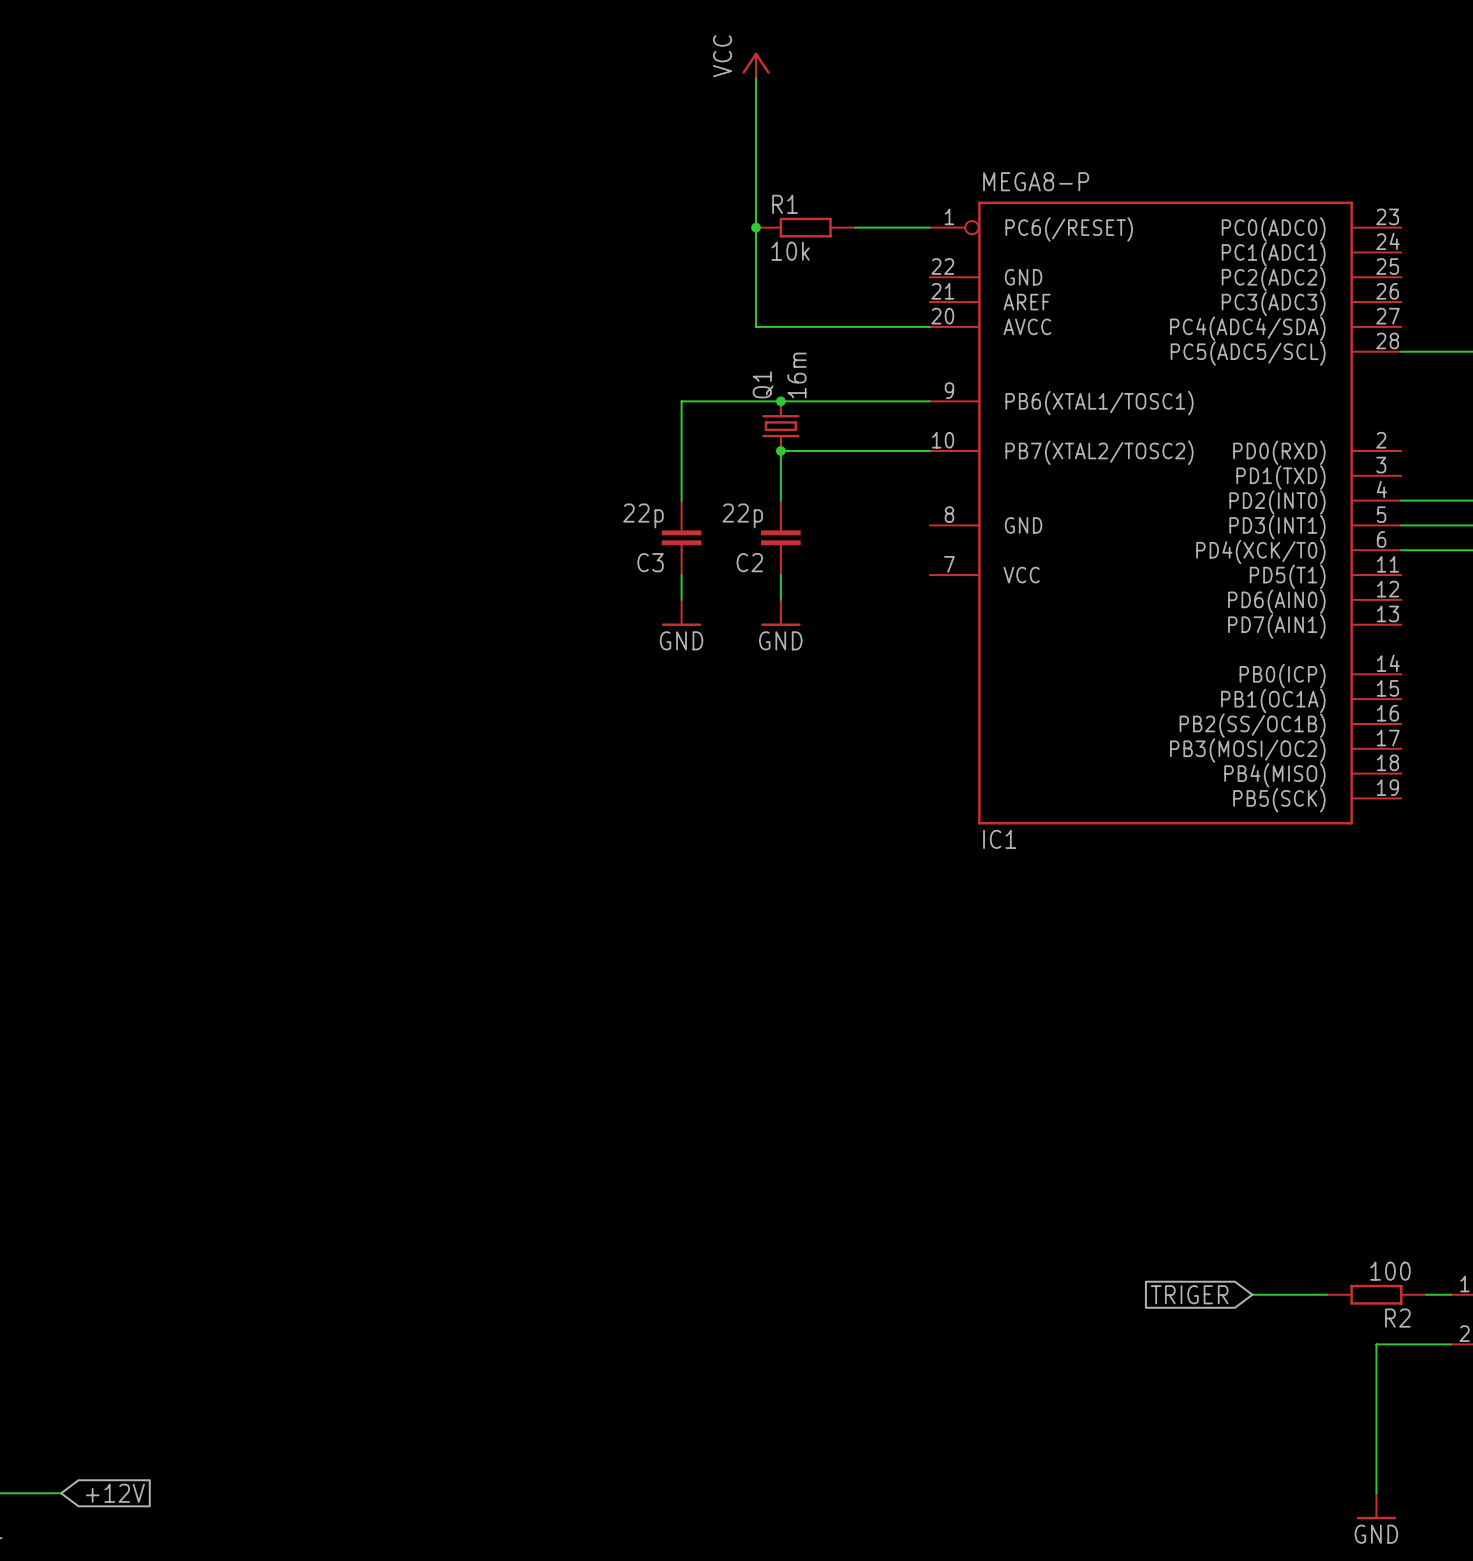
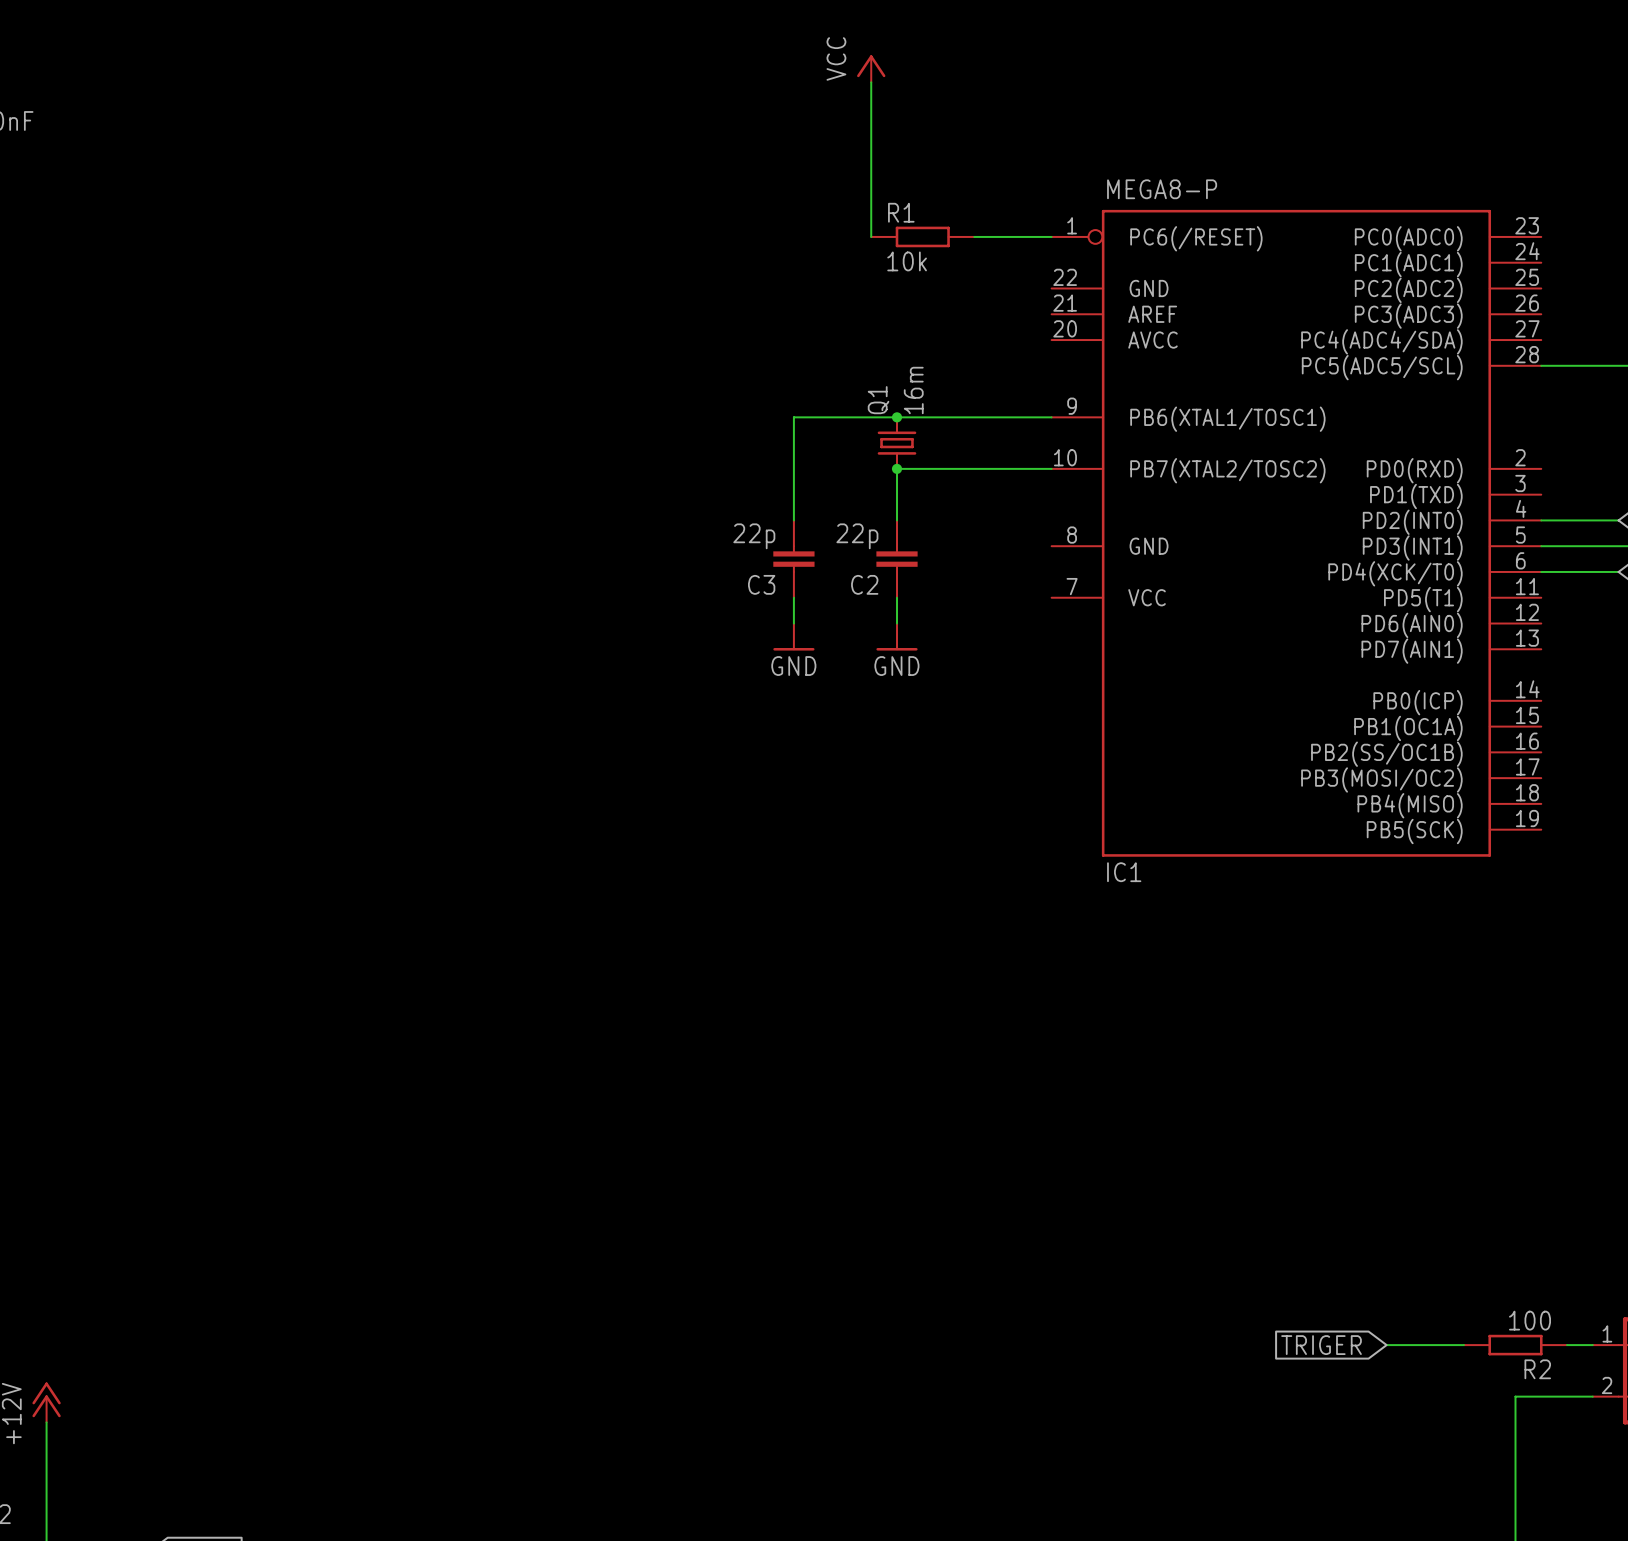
wire: (756, 227) (756, 326) (929, 326) -> none
junction: (756, 227) -> none

